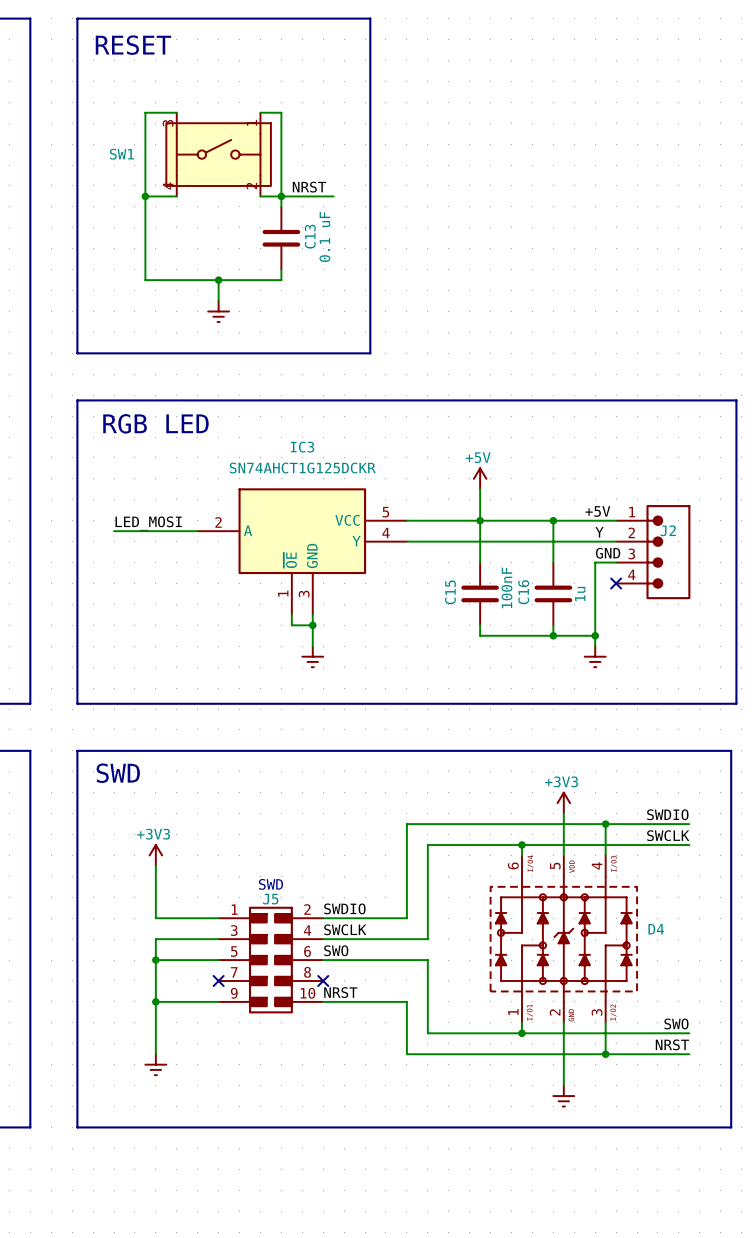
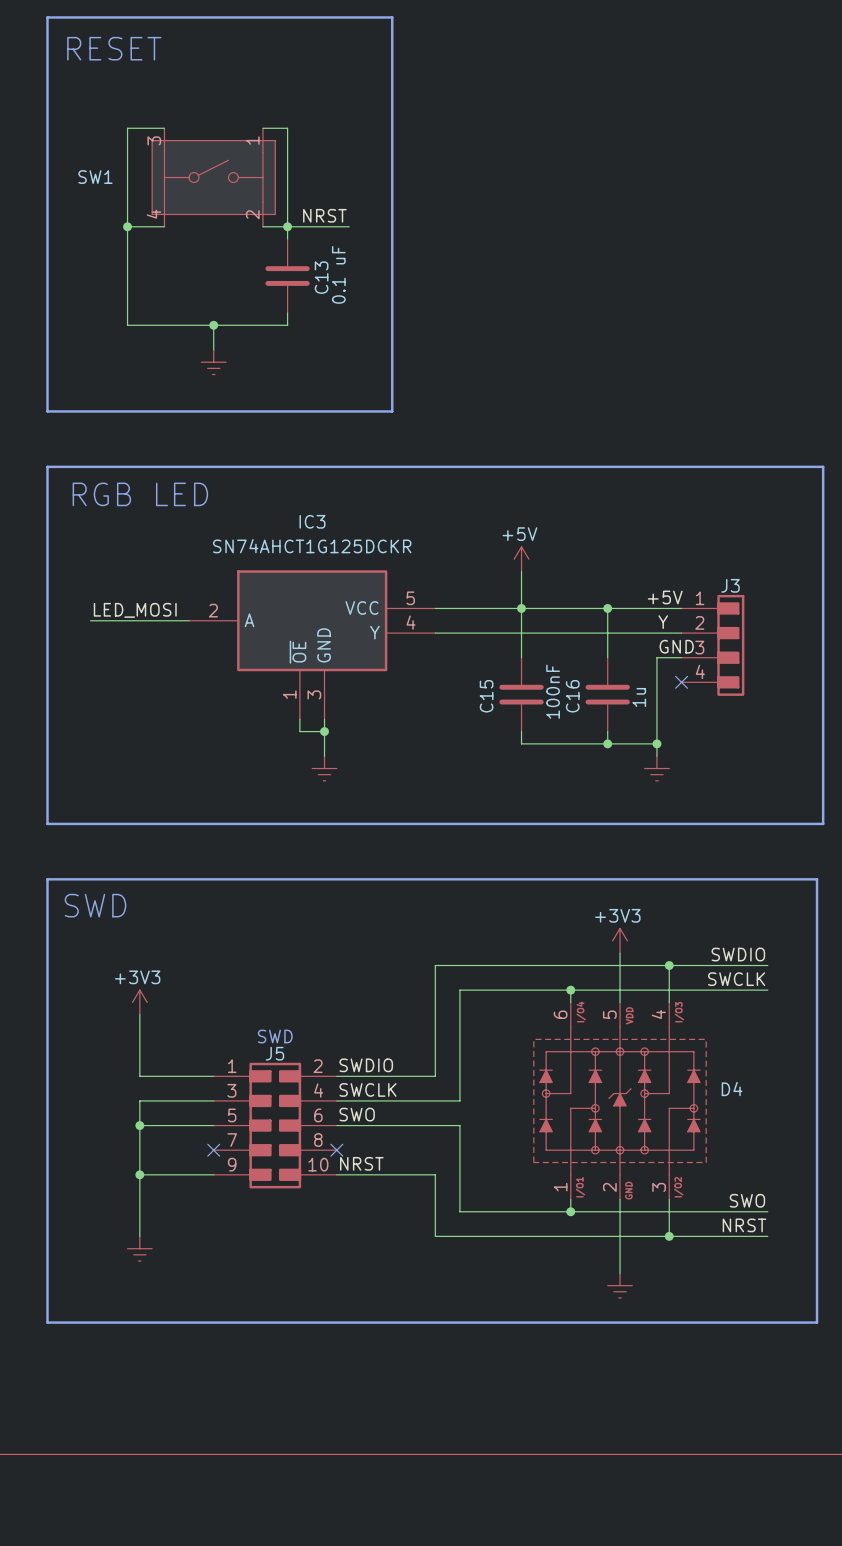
J3: none -> (712, 645)
J2: (653, 552) -> none

